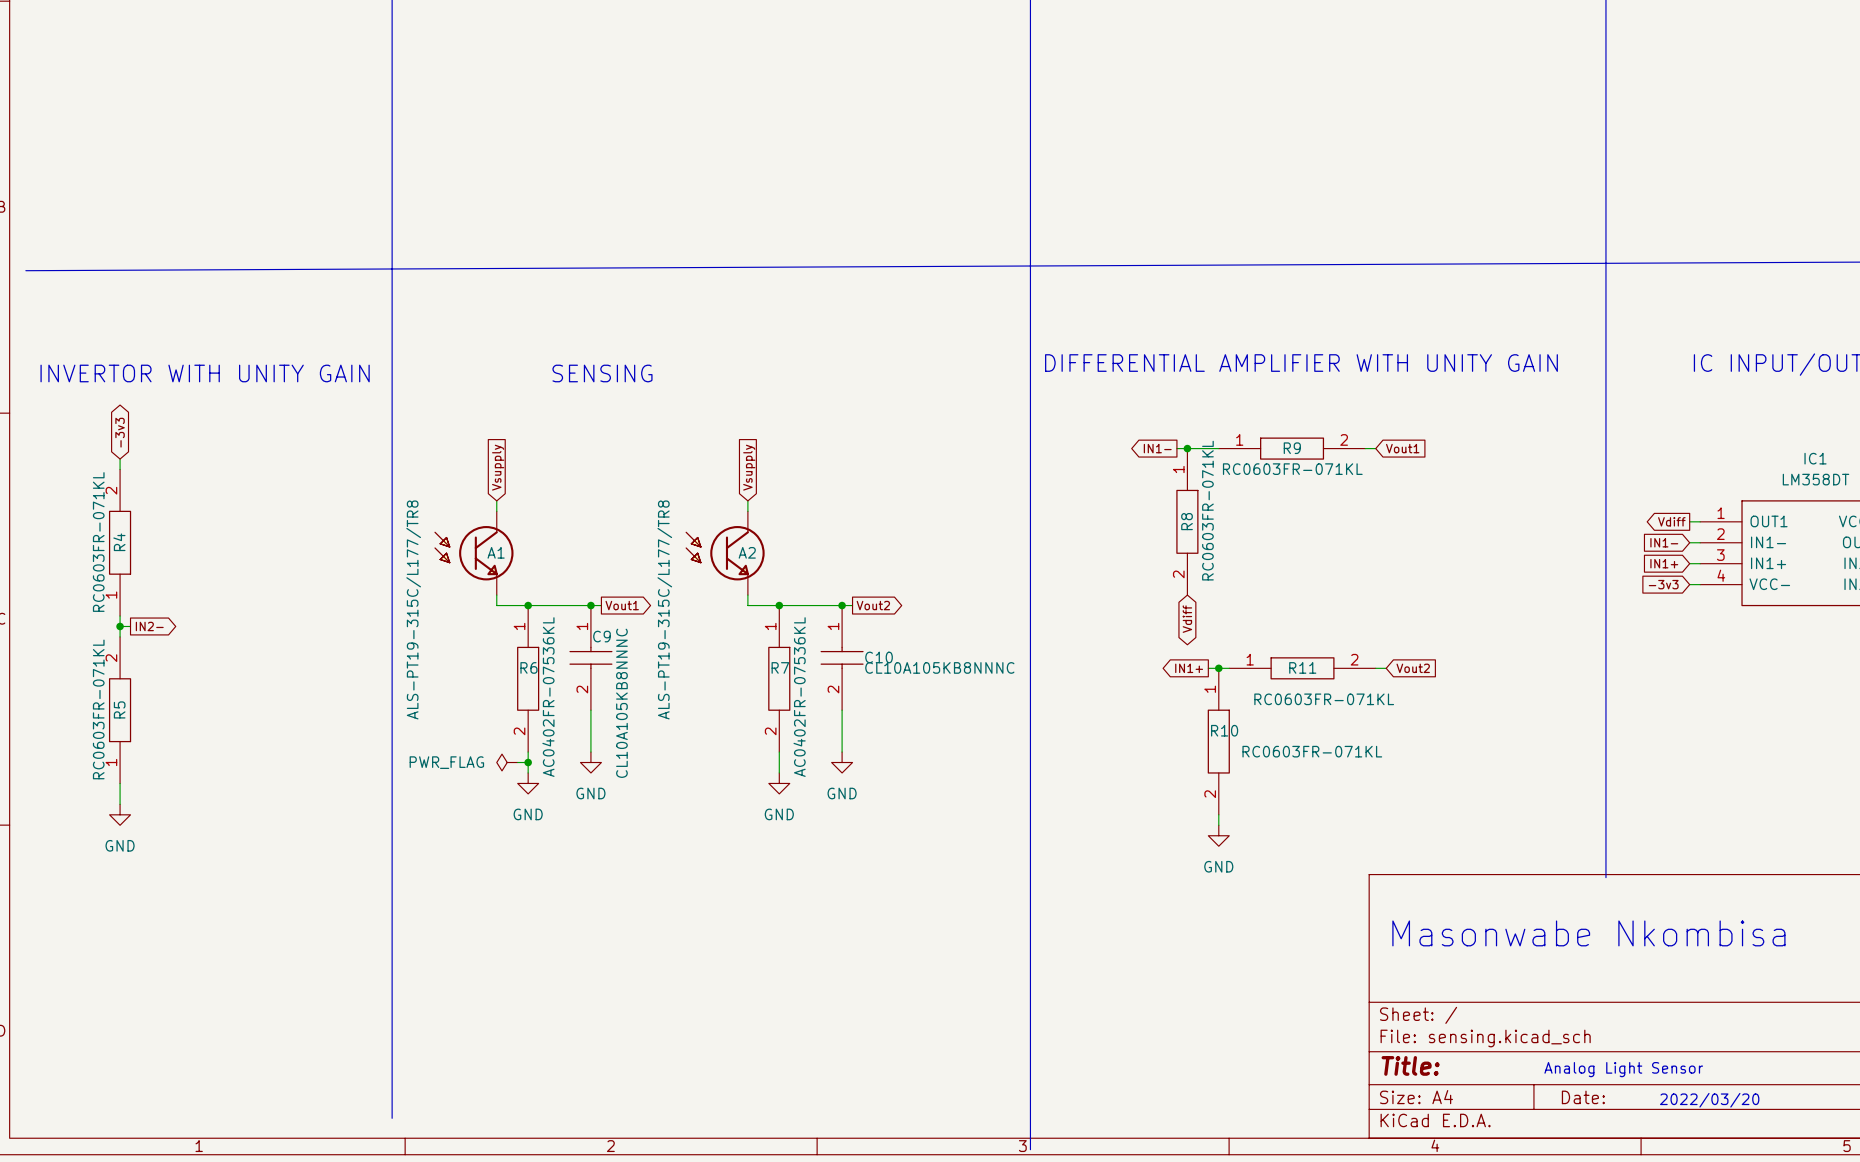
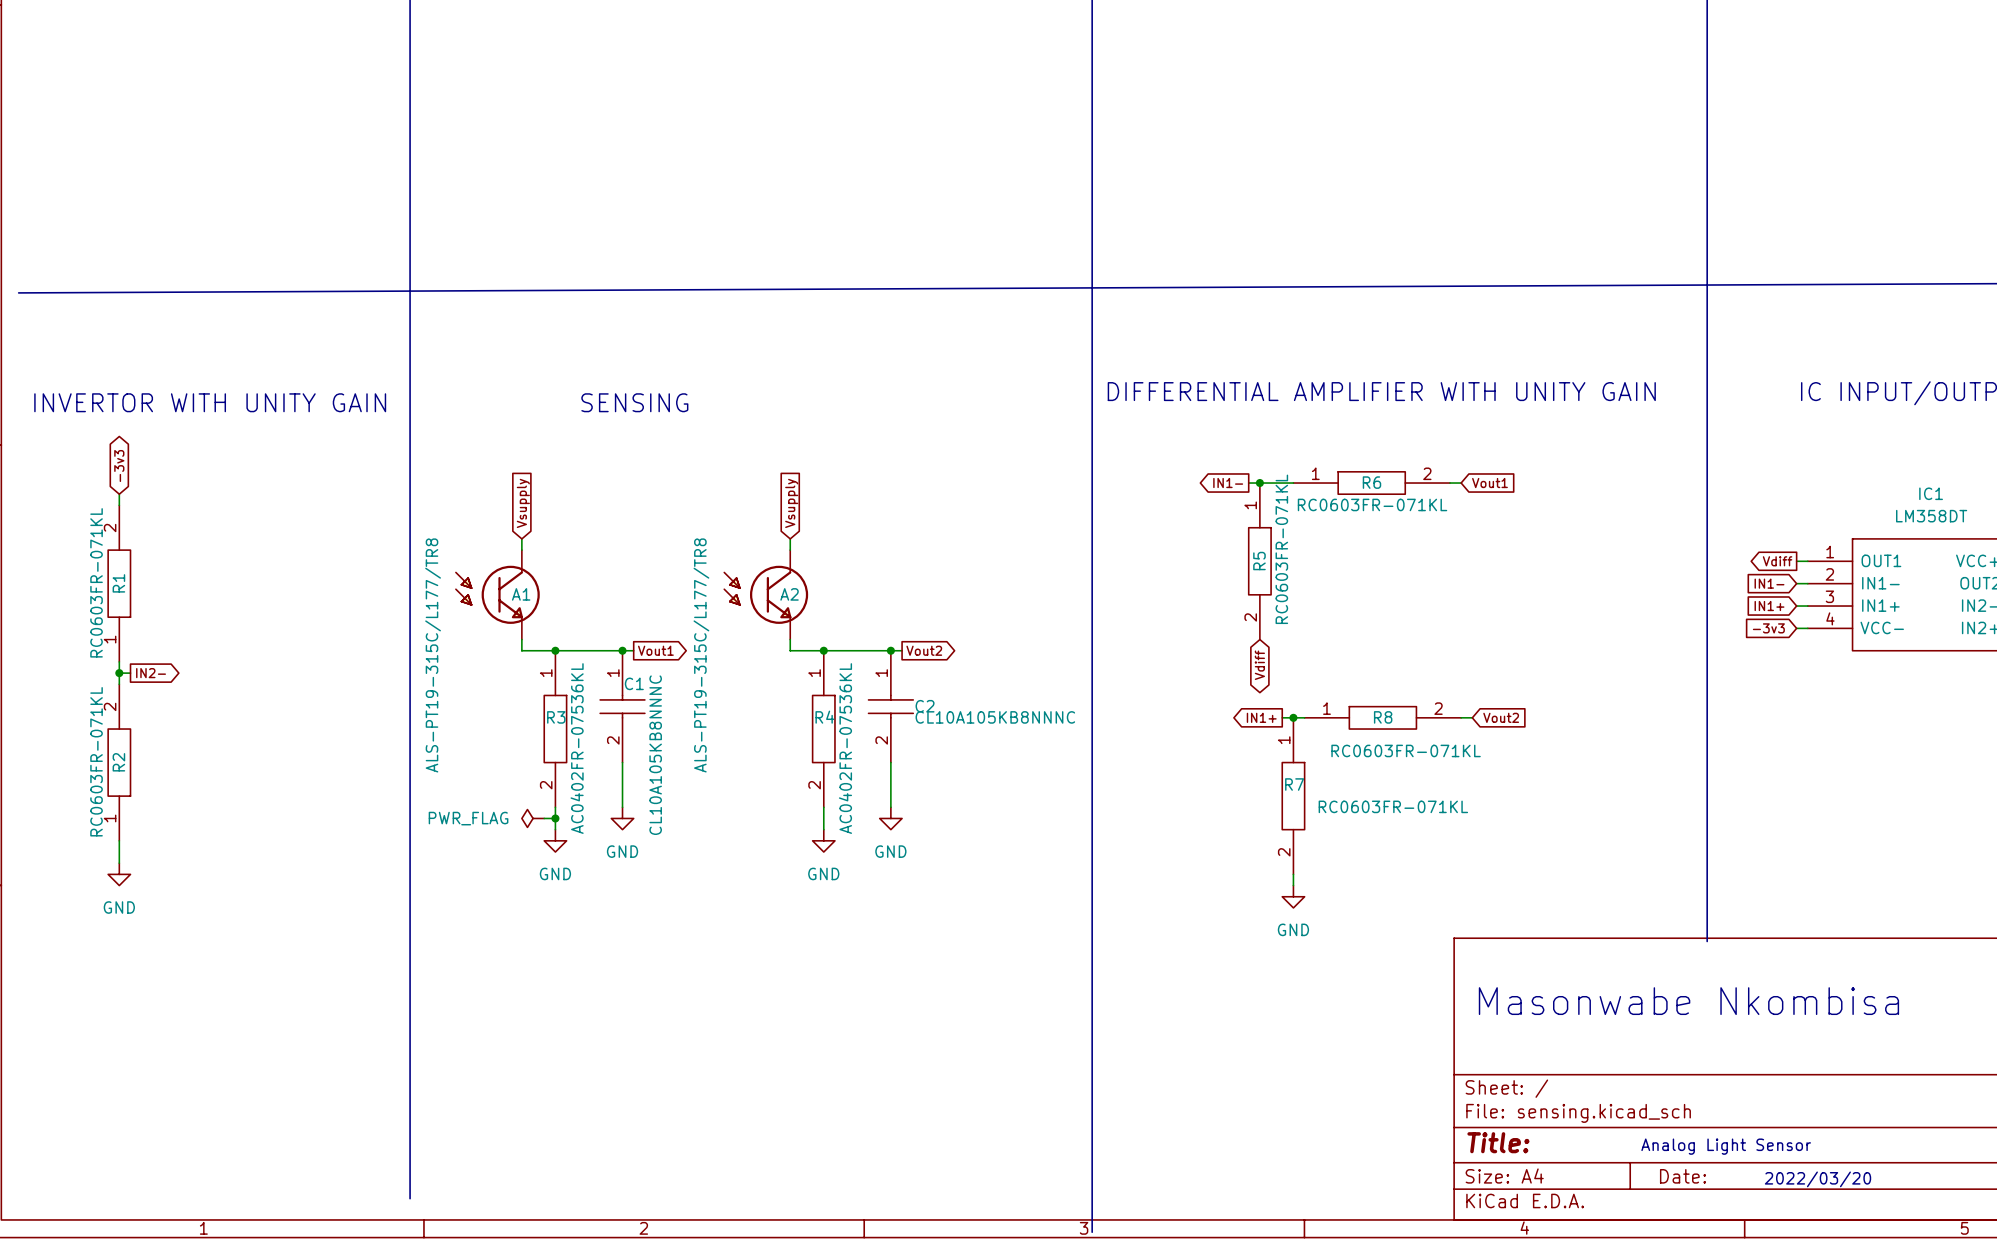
R9 name: R9 (1292, 448) -> R6 (1371, 482)
R8 name: R8 (1187, 521) -> R5 (1259, 561)
R4 name: R4 (119, 542) -> R1 (118, 583)
C9 name: C9 (601, 636) -> C1 (634, 683)
C10 name: C10 (879, 657) -> C2 (925, 706)
R6 name: R6 (528, 667) -> R3 (556, 717)
R7 name: R7 (780, 667) -> R4 (824, 717)
R11 name: R11 (1302, 667) -> R8 (1383, 717)
R5 name: R5 (119, 709) -> R2 (118, 762)
R10 name: R10 (1224, 730) -> R7 (1294, 784)

